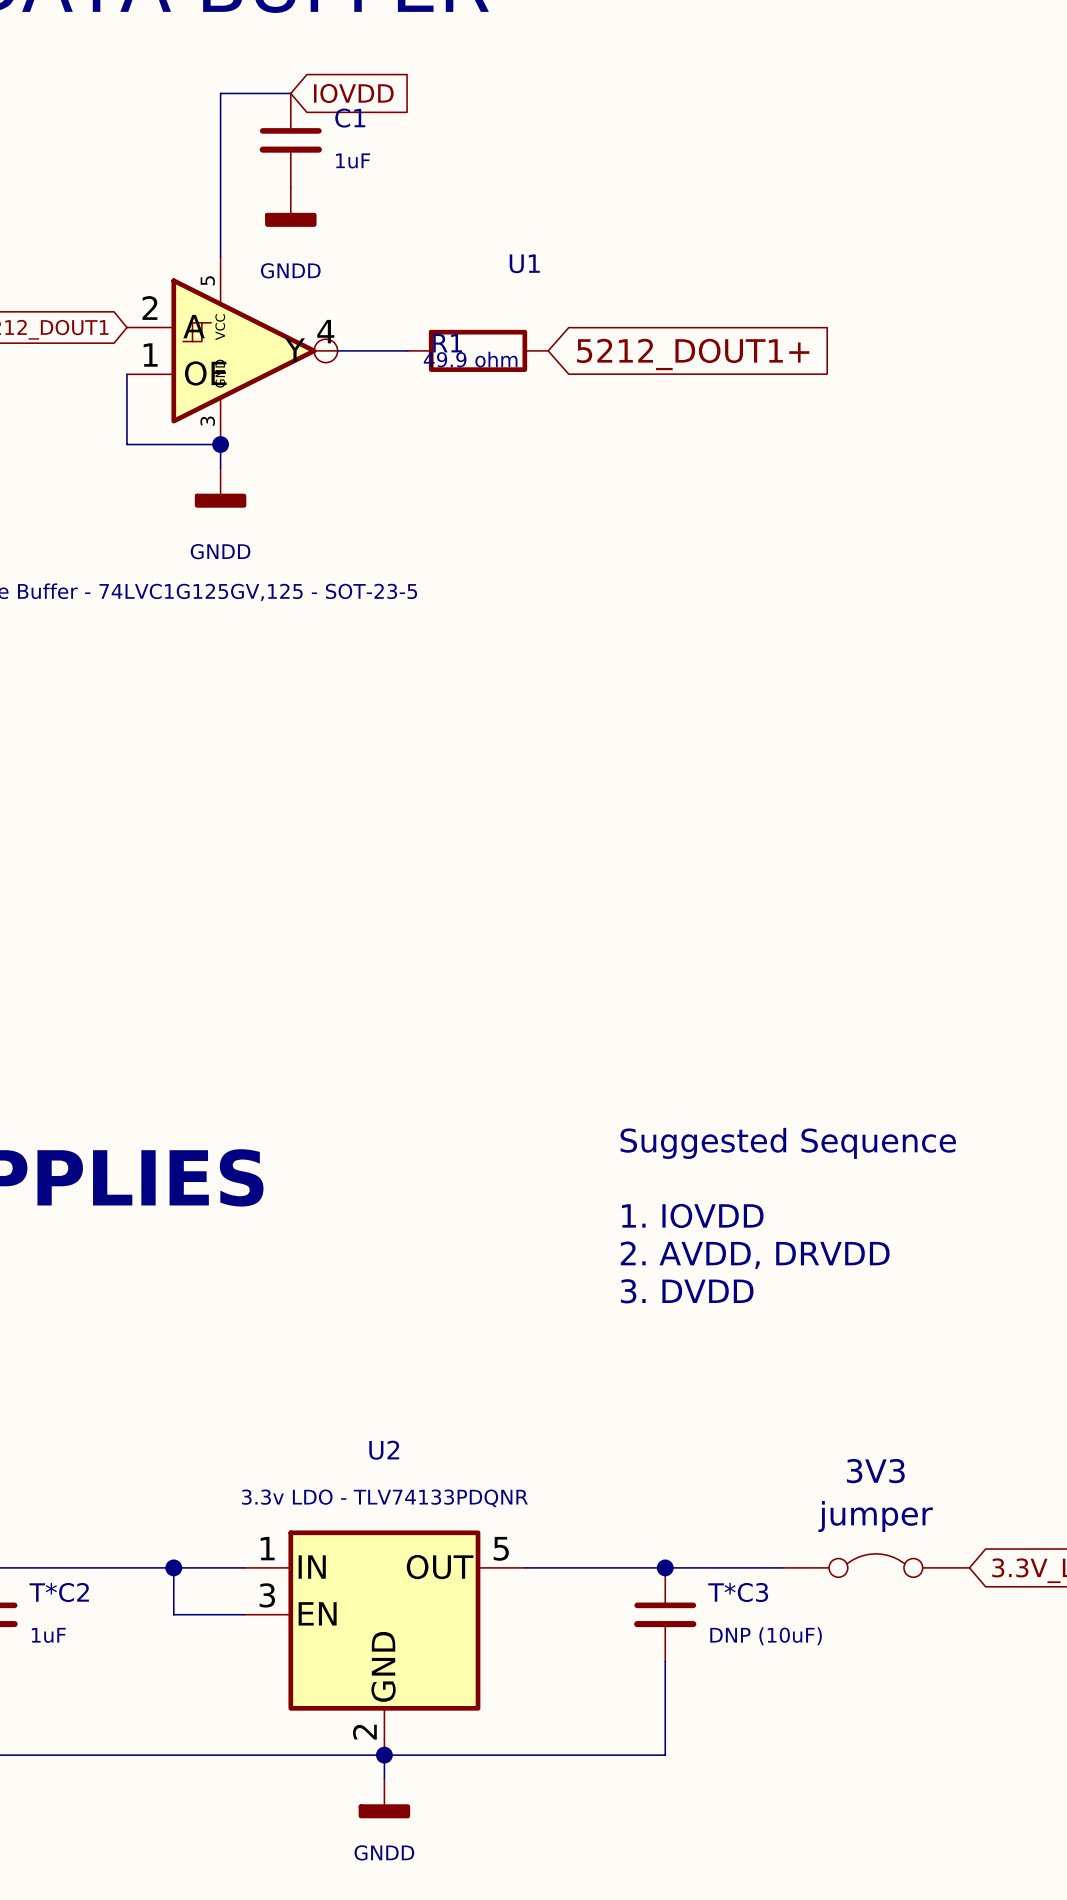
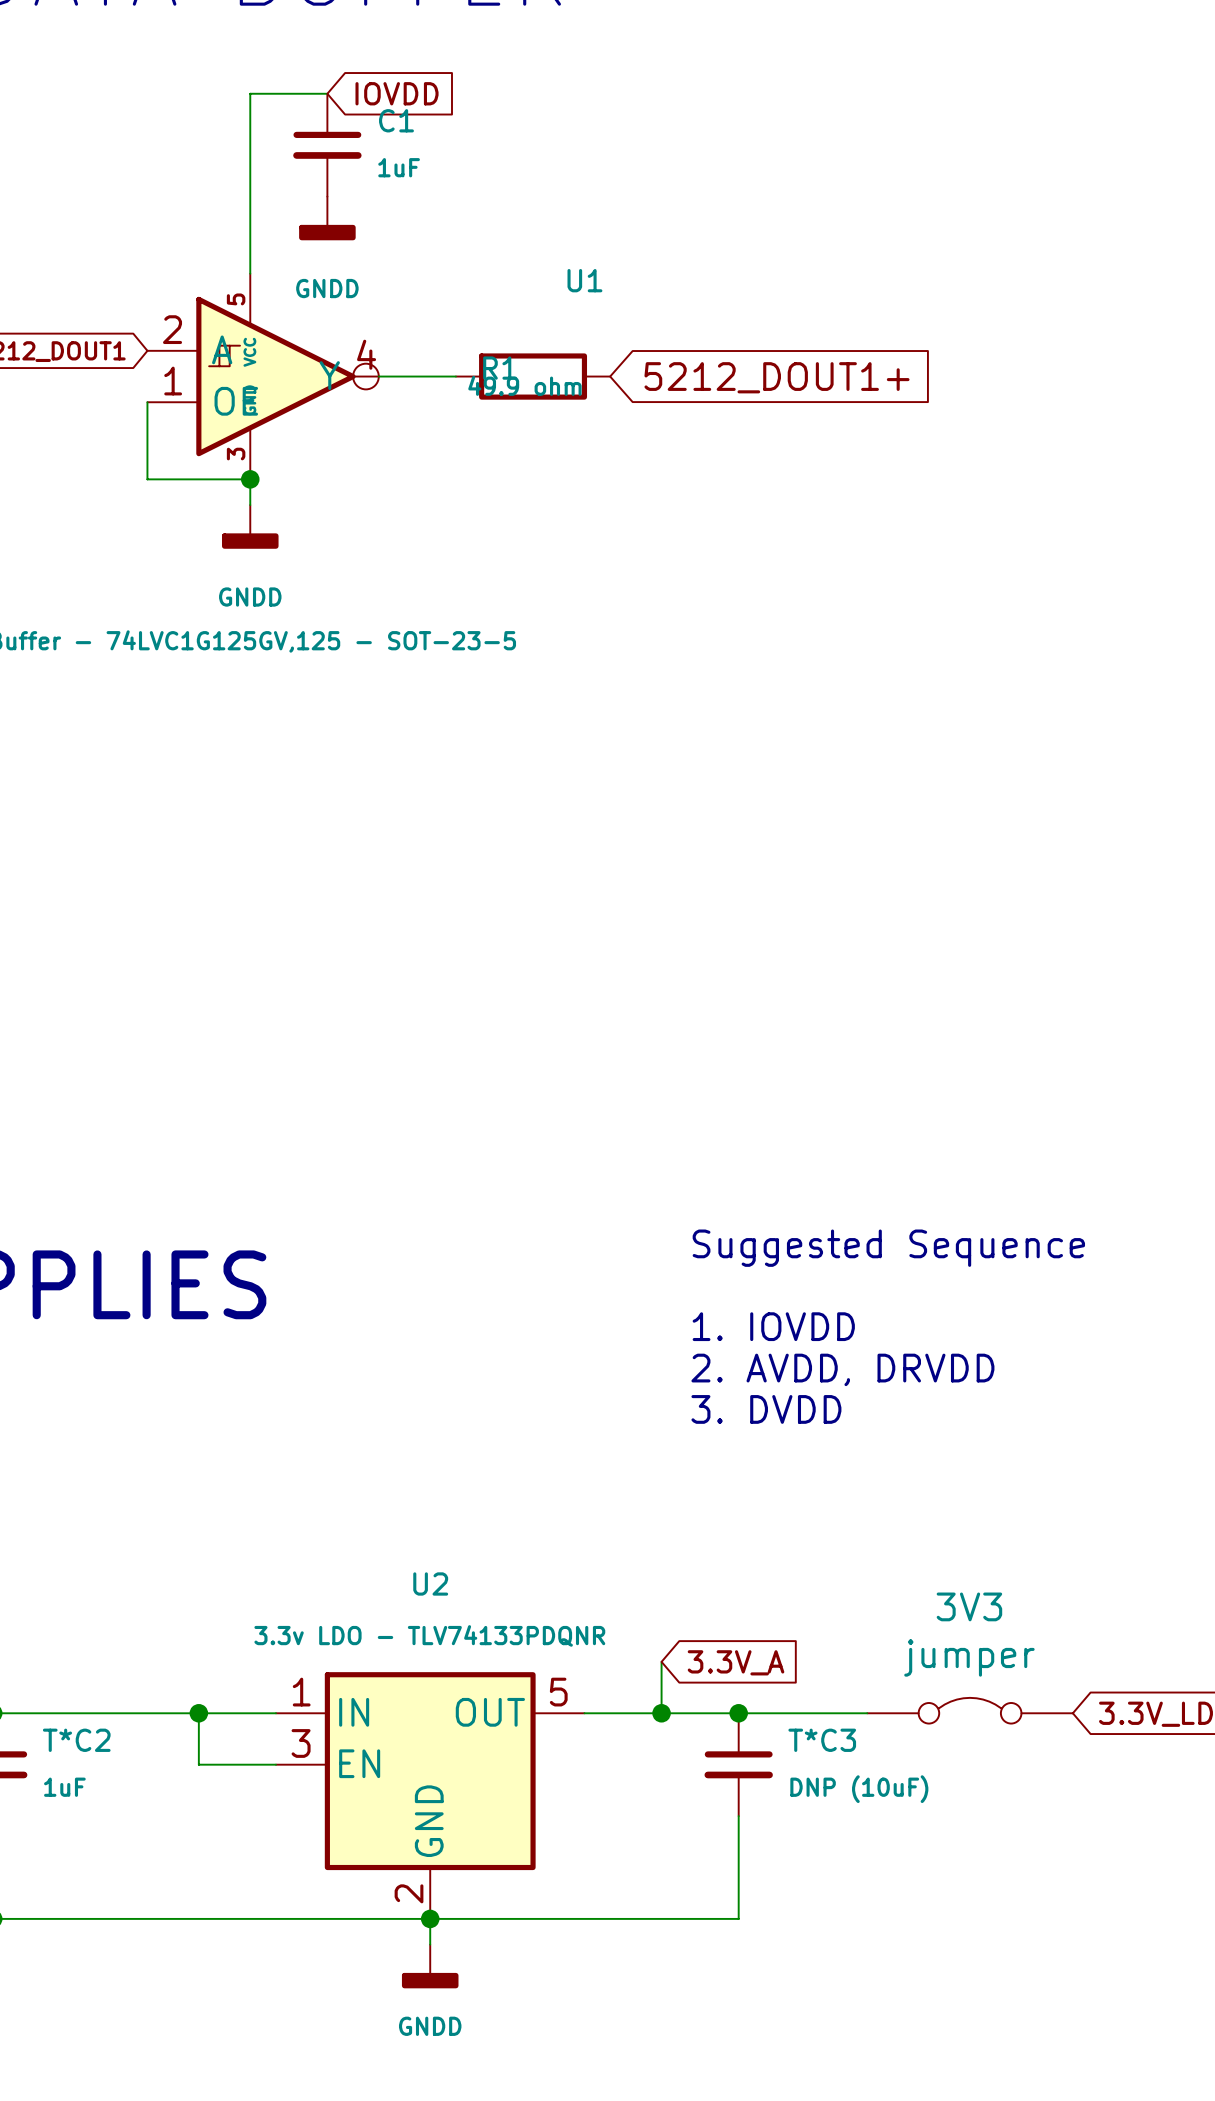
wire: none -> (661, 1661) (661, 1713)
global label: none -> 3.3V_A (736, 1662)
junction: none -> (661, 1713)

